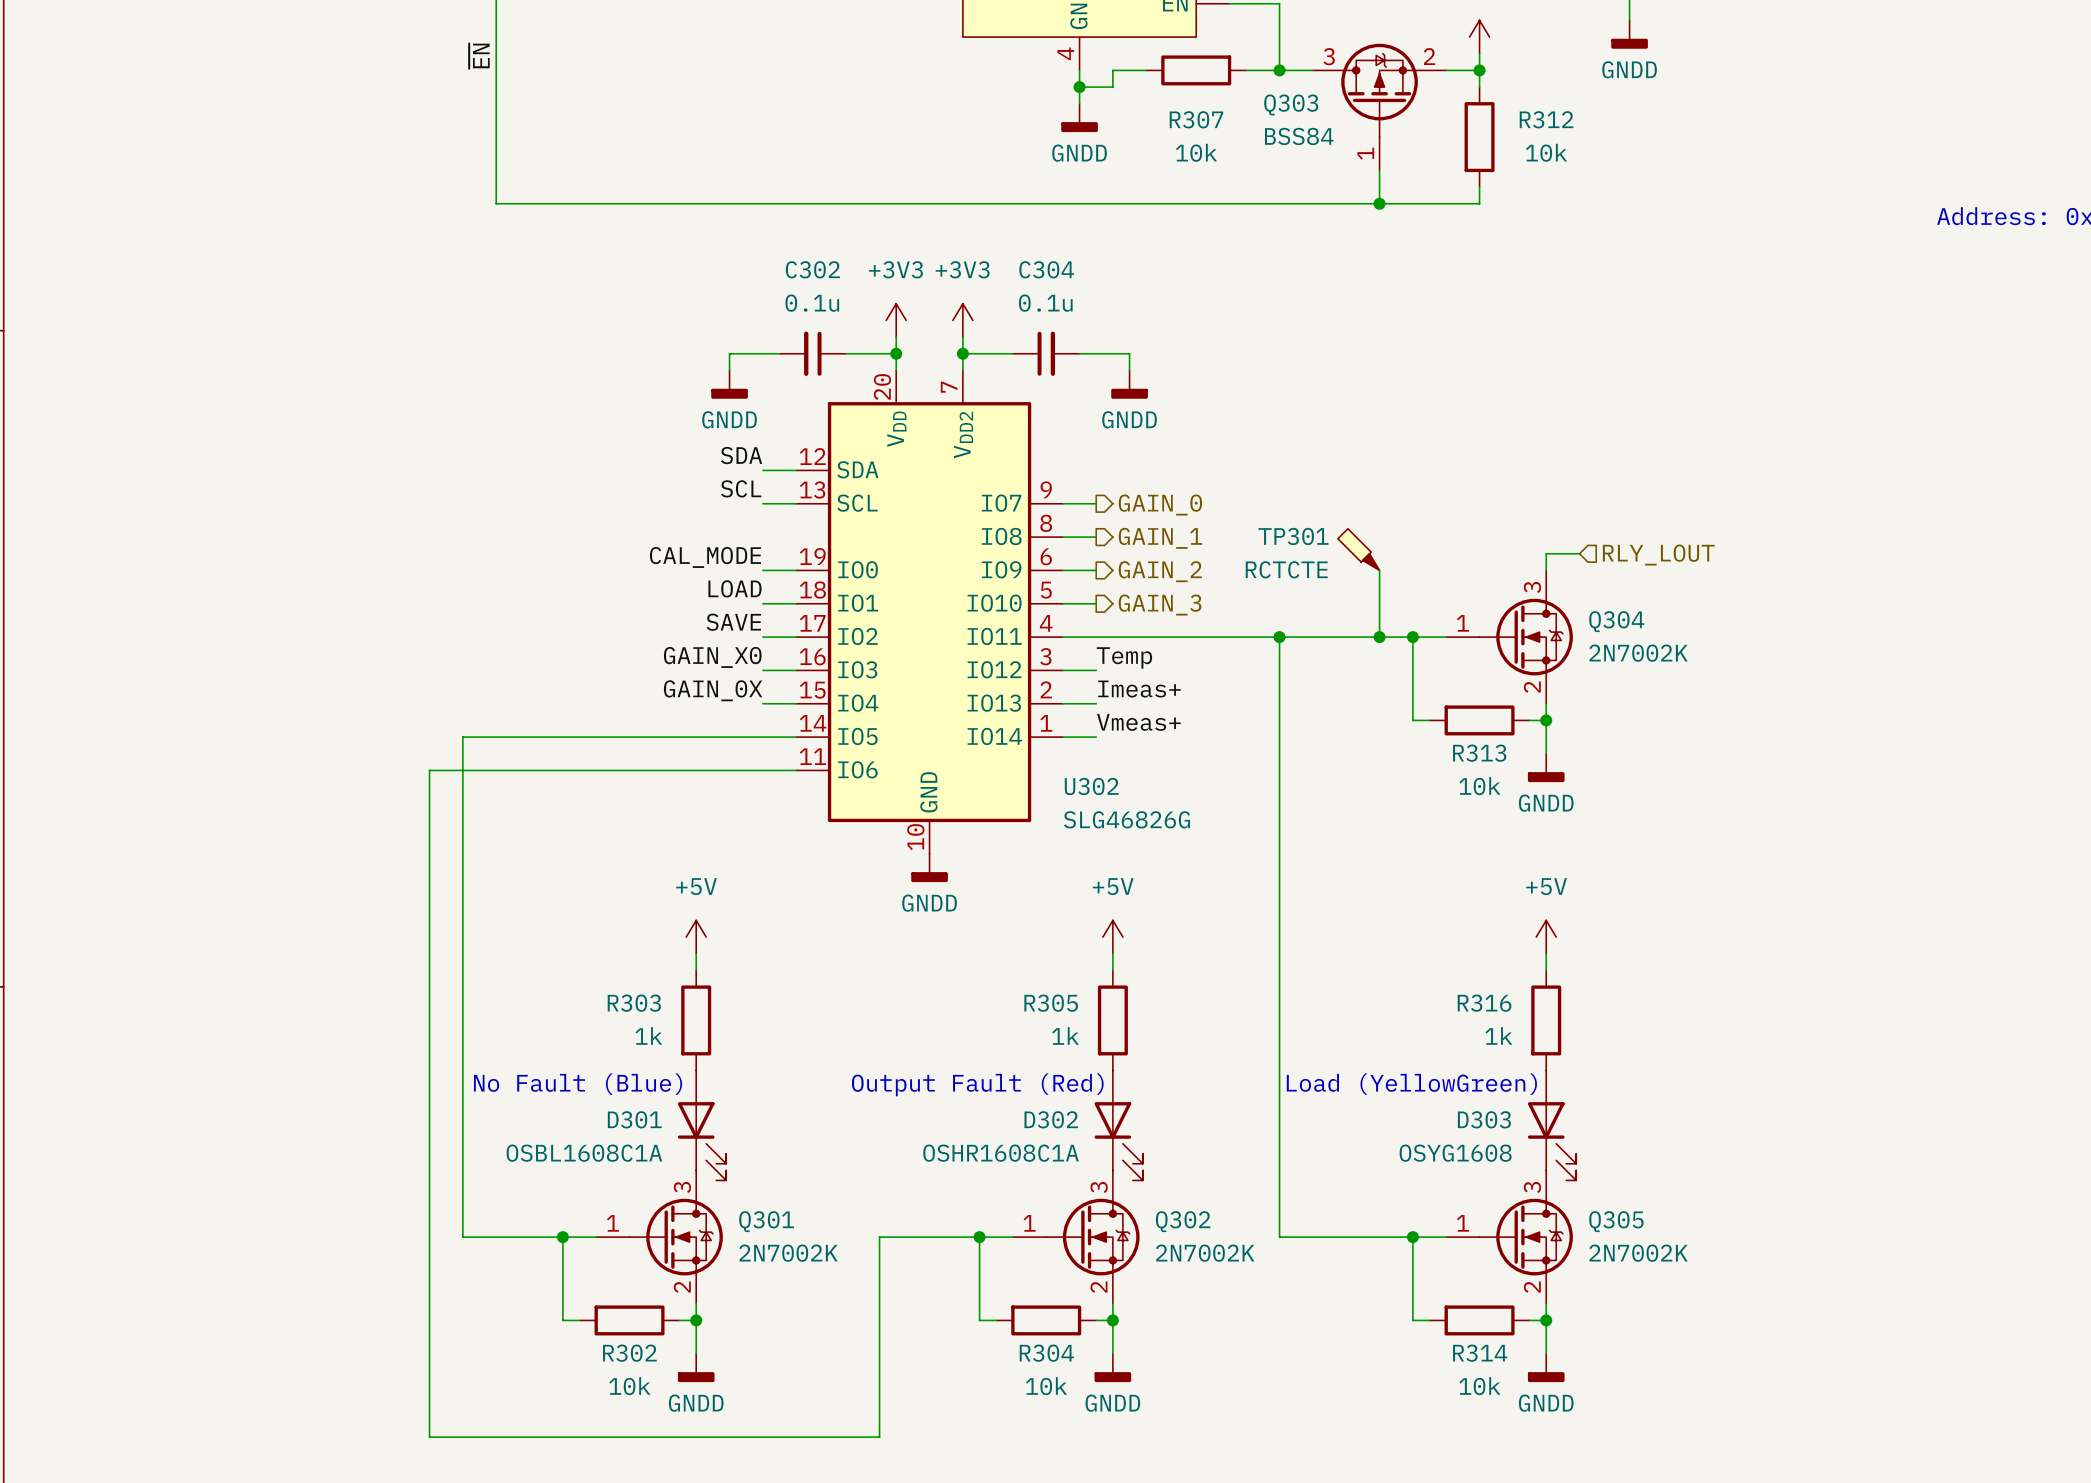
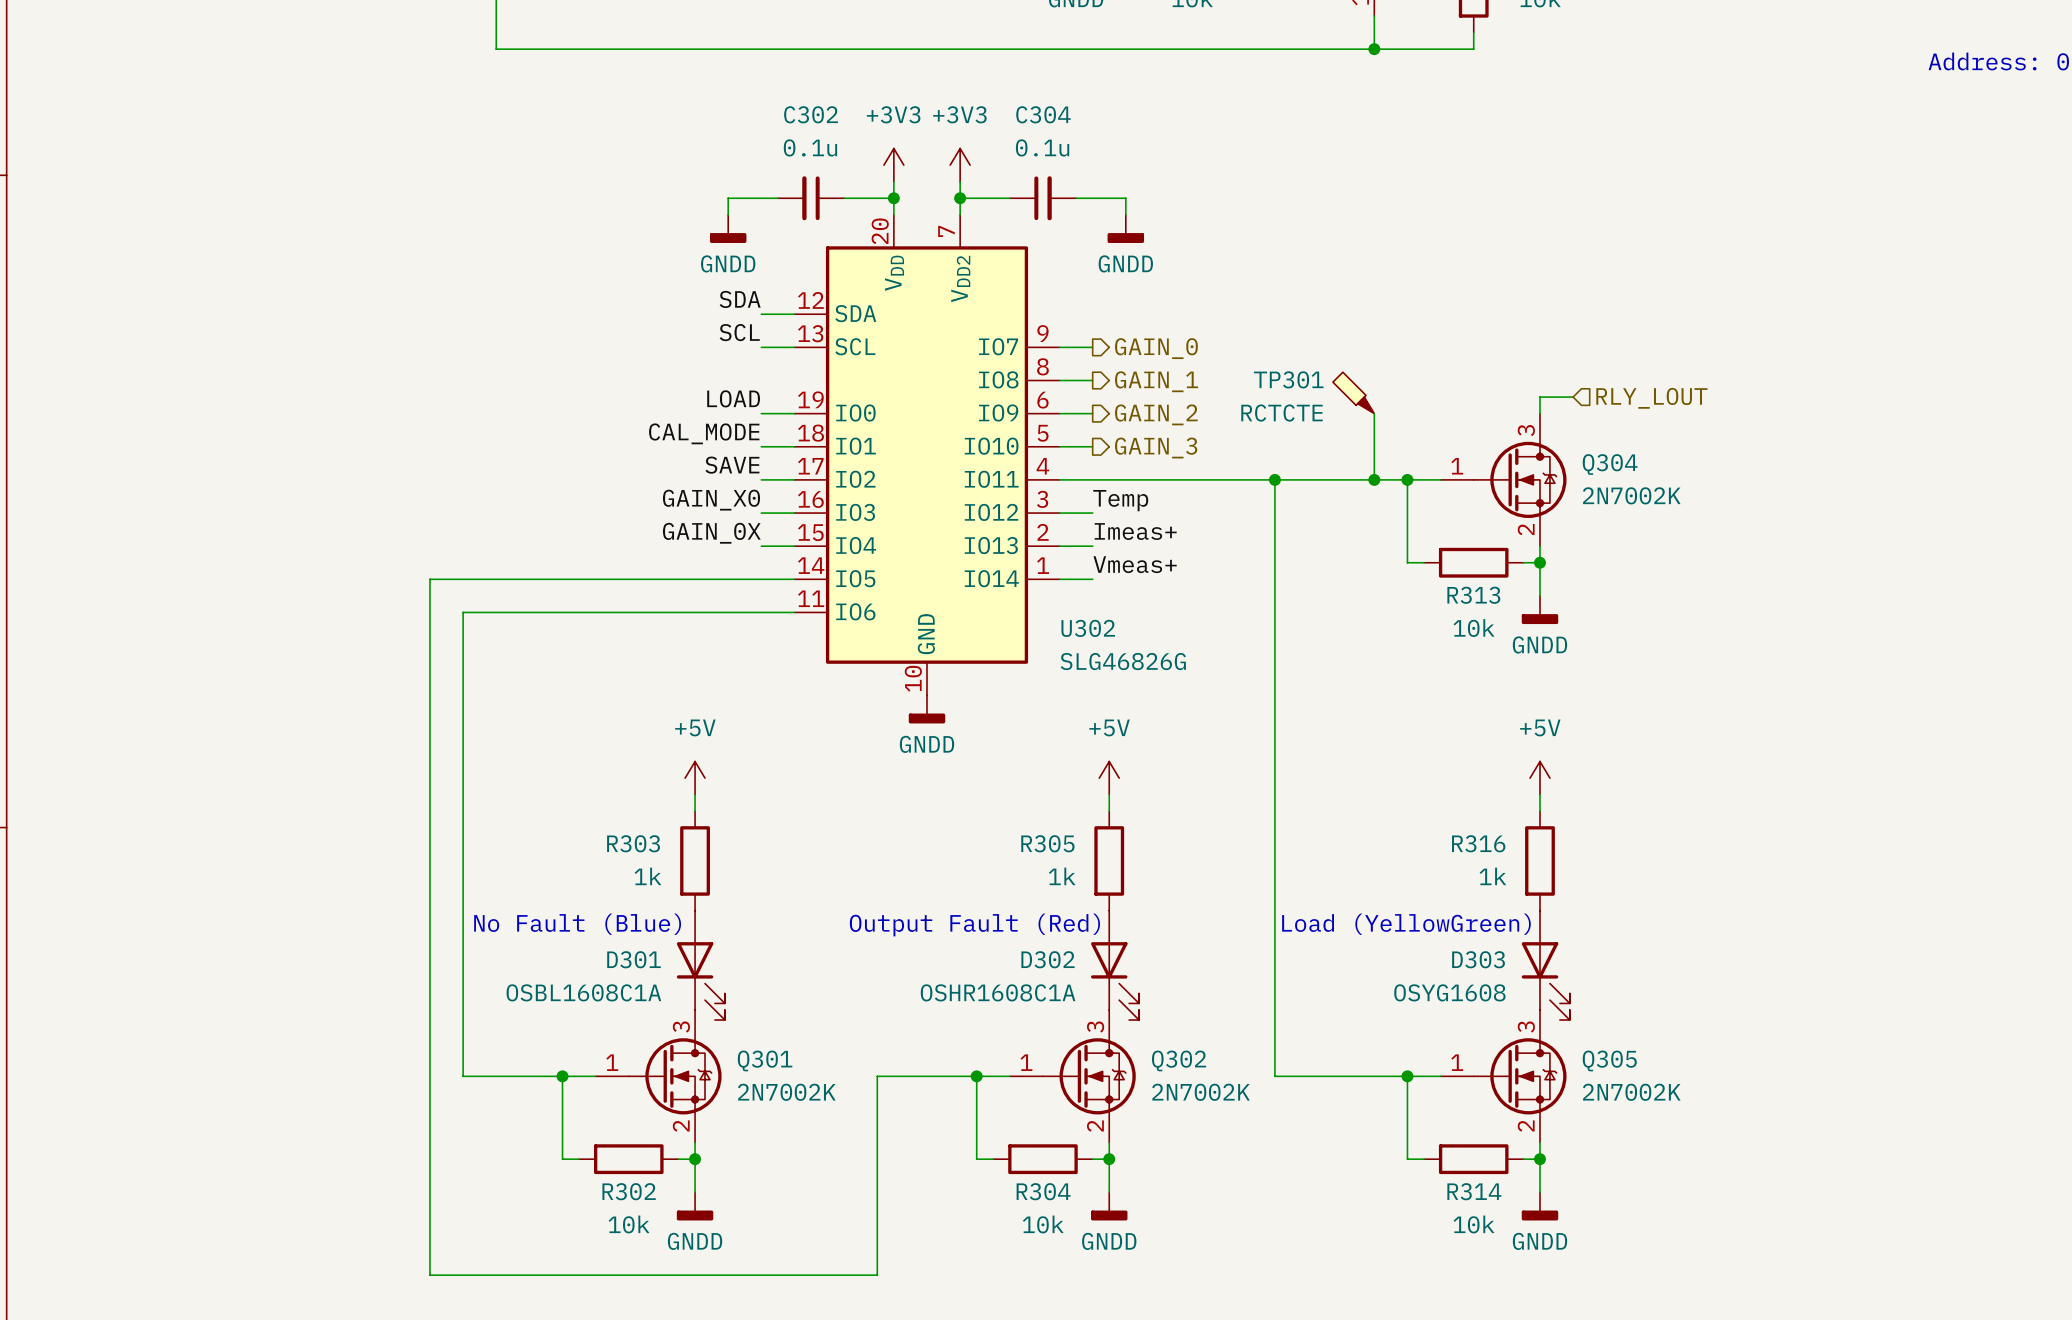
label: CAL_MODE (705, 557) -> LOAD (733, 398)
label: LOAD (734, 588) -> CAL_MODE (704, 433)
wire: (462, 737) (462, 770) (429, 770) -> (463, 579) (429, 579) (429, 612)

